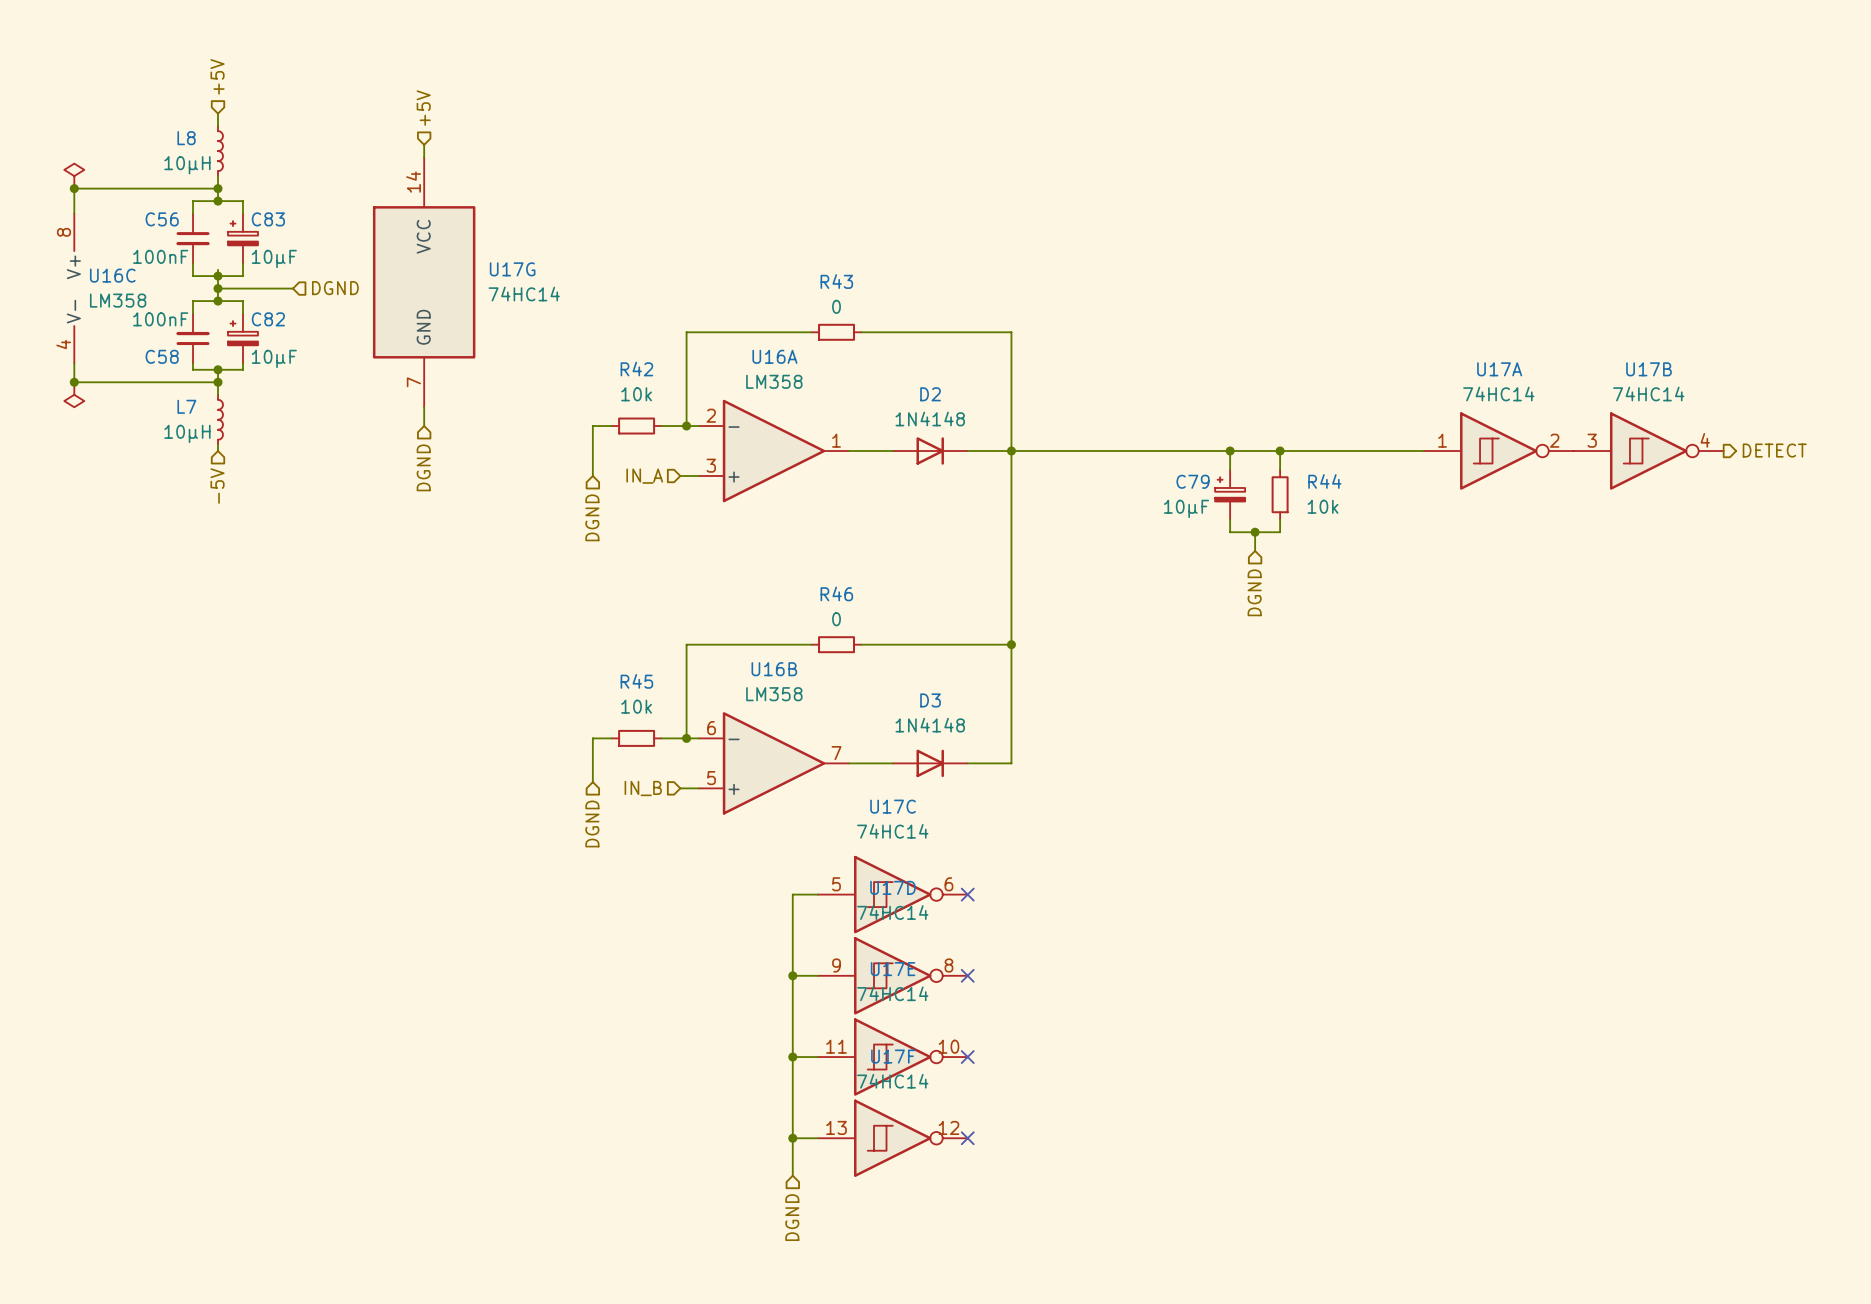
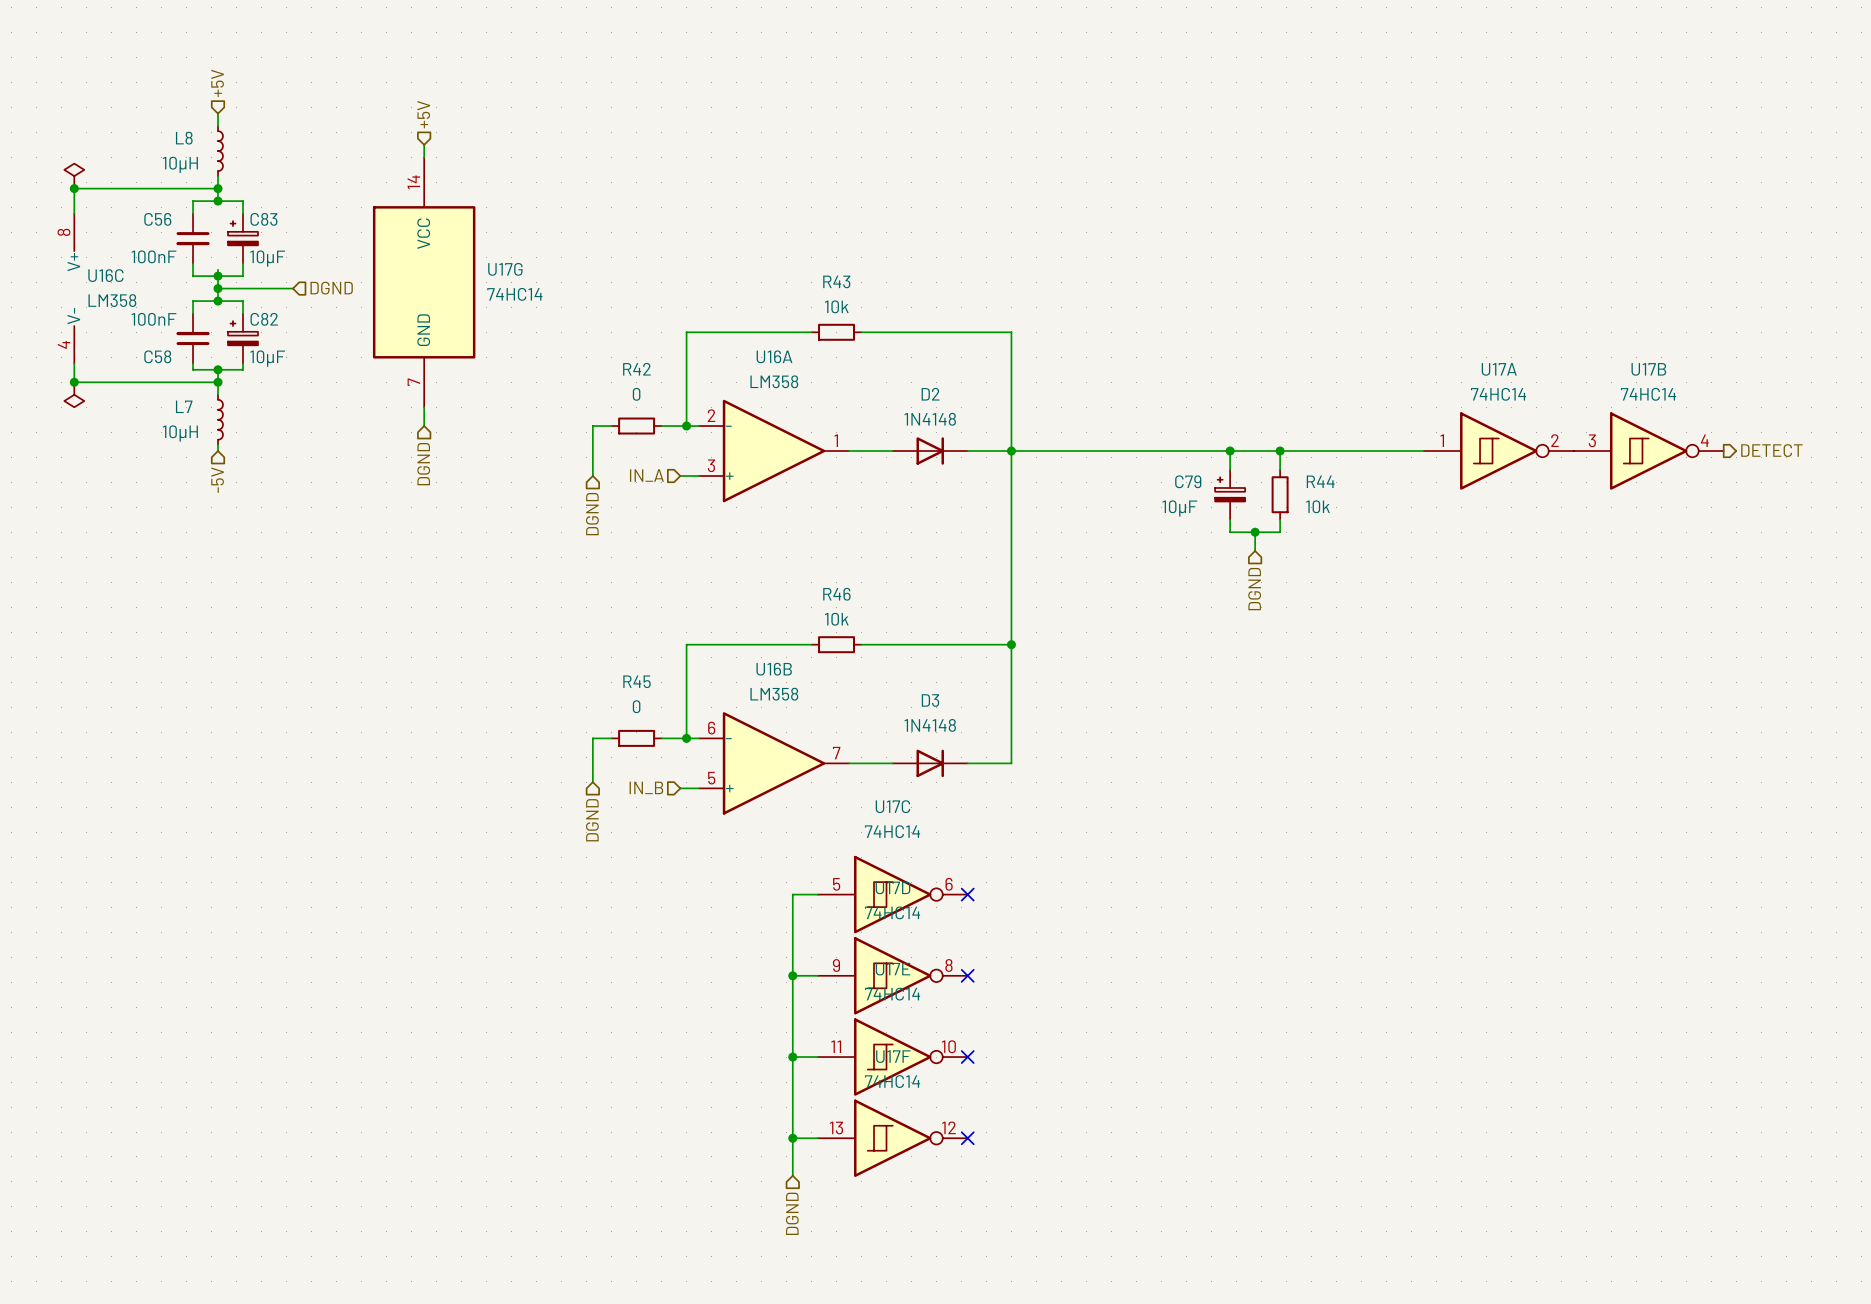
R43 value: 0 (836, 306) -> 10k (836, 306)
R42 value: 10k (636, 394) -> 0 (636, 394)
R46 value: 0 (836, 619) -> 10k (836, 619)
R45 value: 10k (636, 706) -> 0 (636, 706)

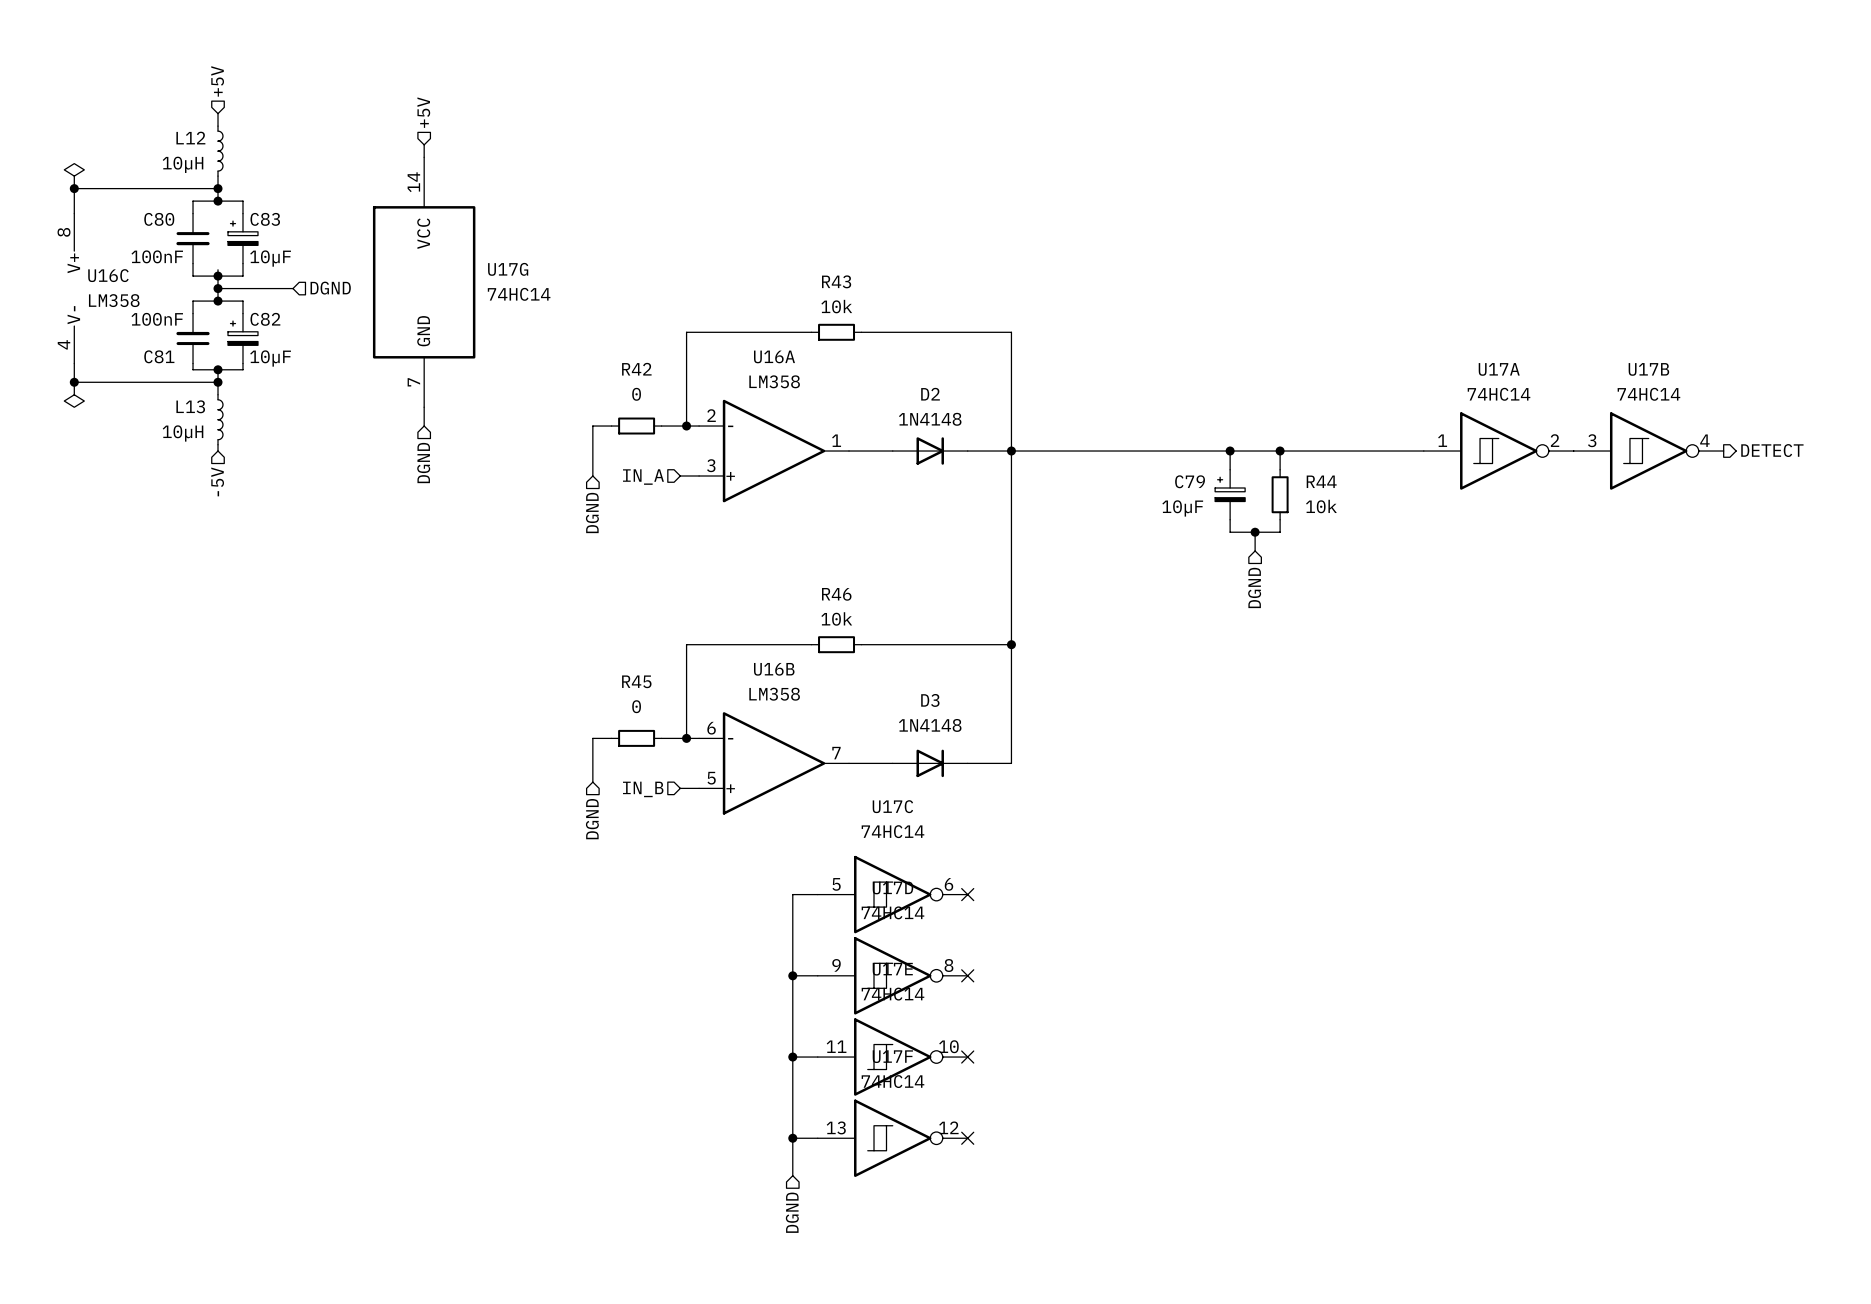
L8 name: L8 (184, 138) -> L12 (190, 138)
C56 name: C56 (157, 219) -> C80 (159, 219)
C58 name: C58 (157, 356) -> C81 (159, 356)
L7 name: L7 (184, 406) -> L13 (190, 406)

